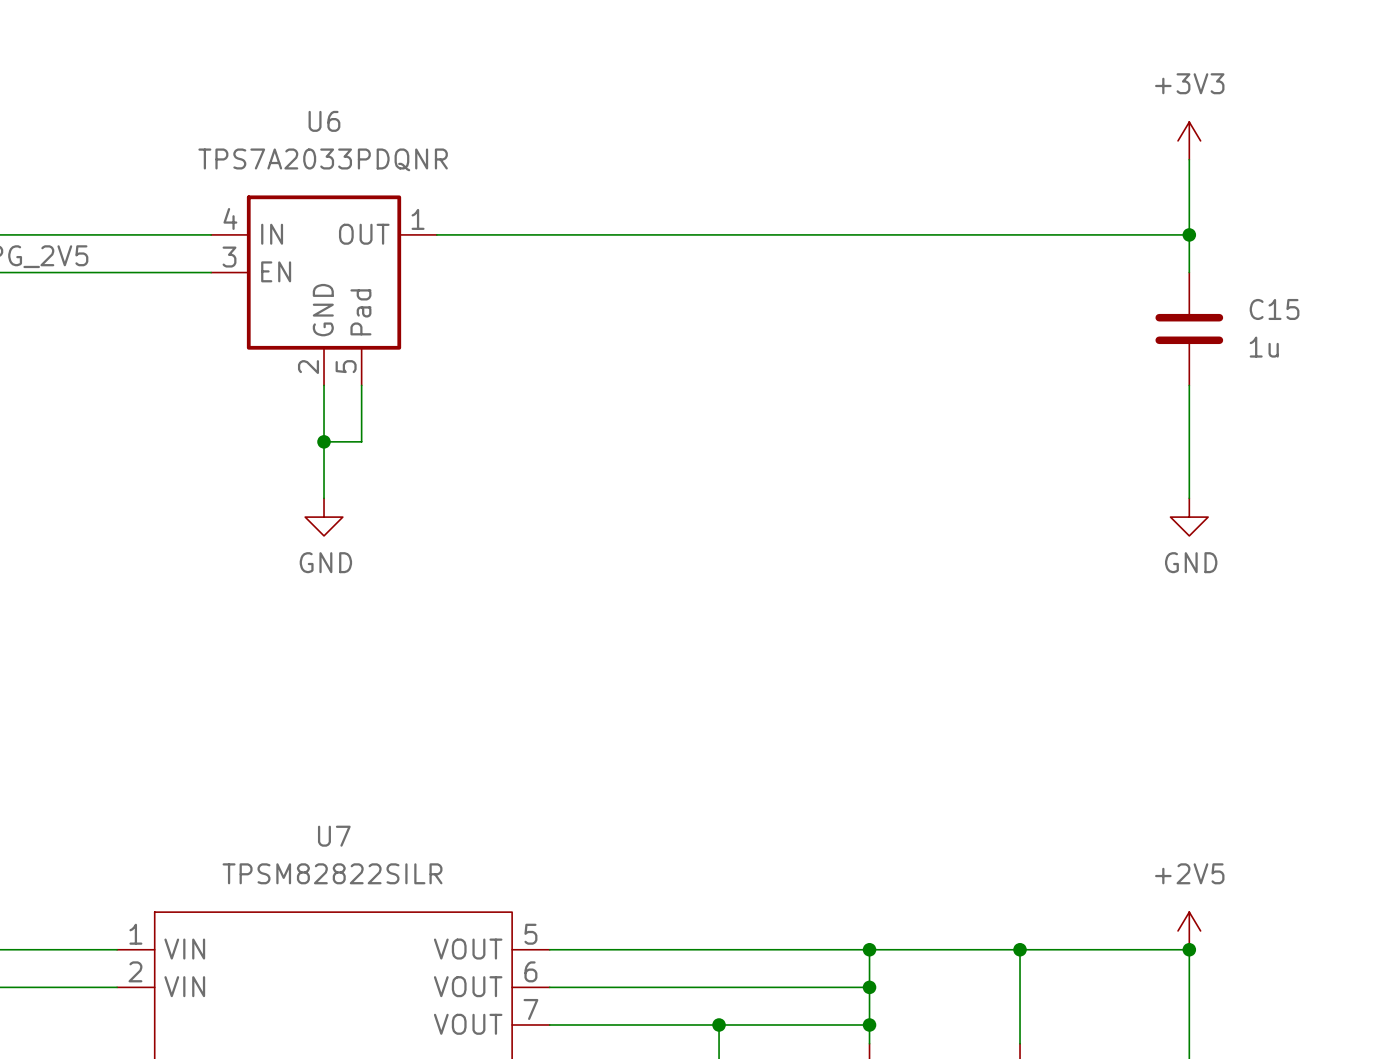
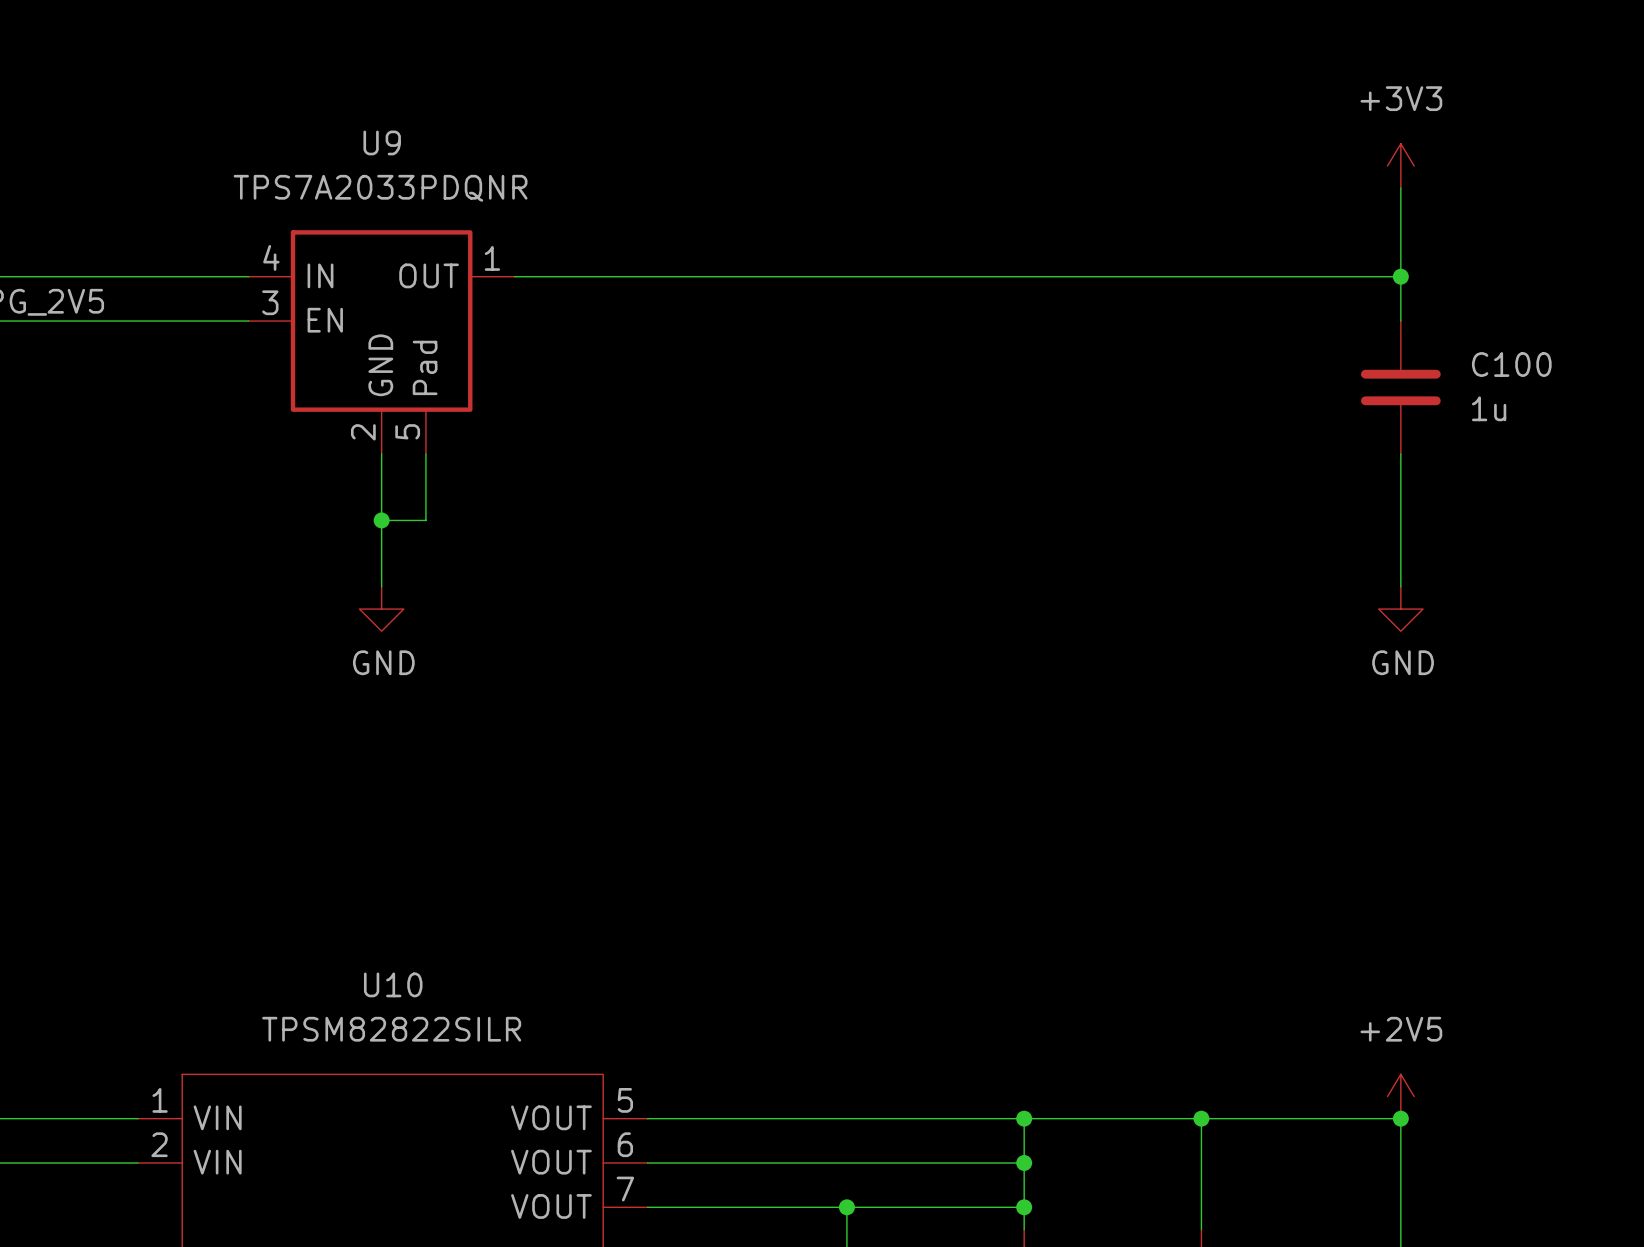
U6 name: U6 (324, 121) -> U9 (382, 142)
C15 name: C15 (1274, 309) -> C100 (1511, 364)
U7 name: U7 (334, 836) -> U10 (393, 984)

